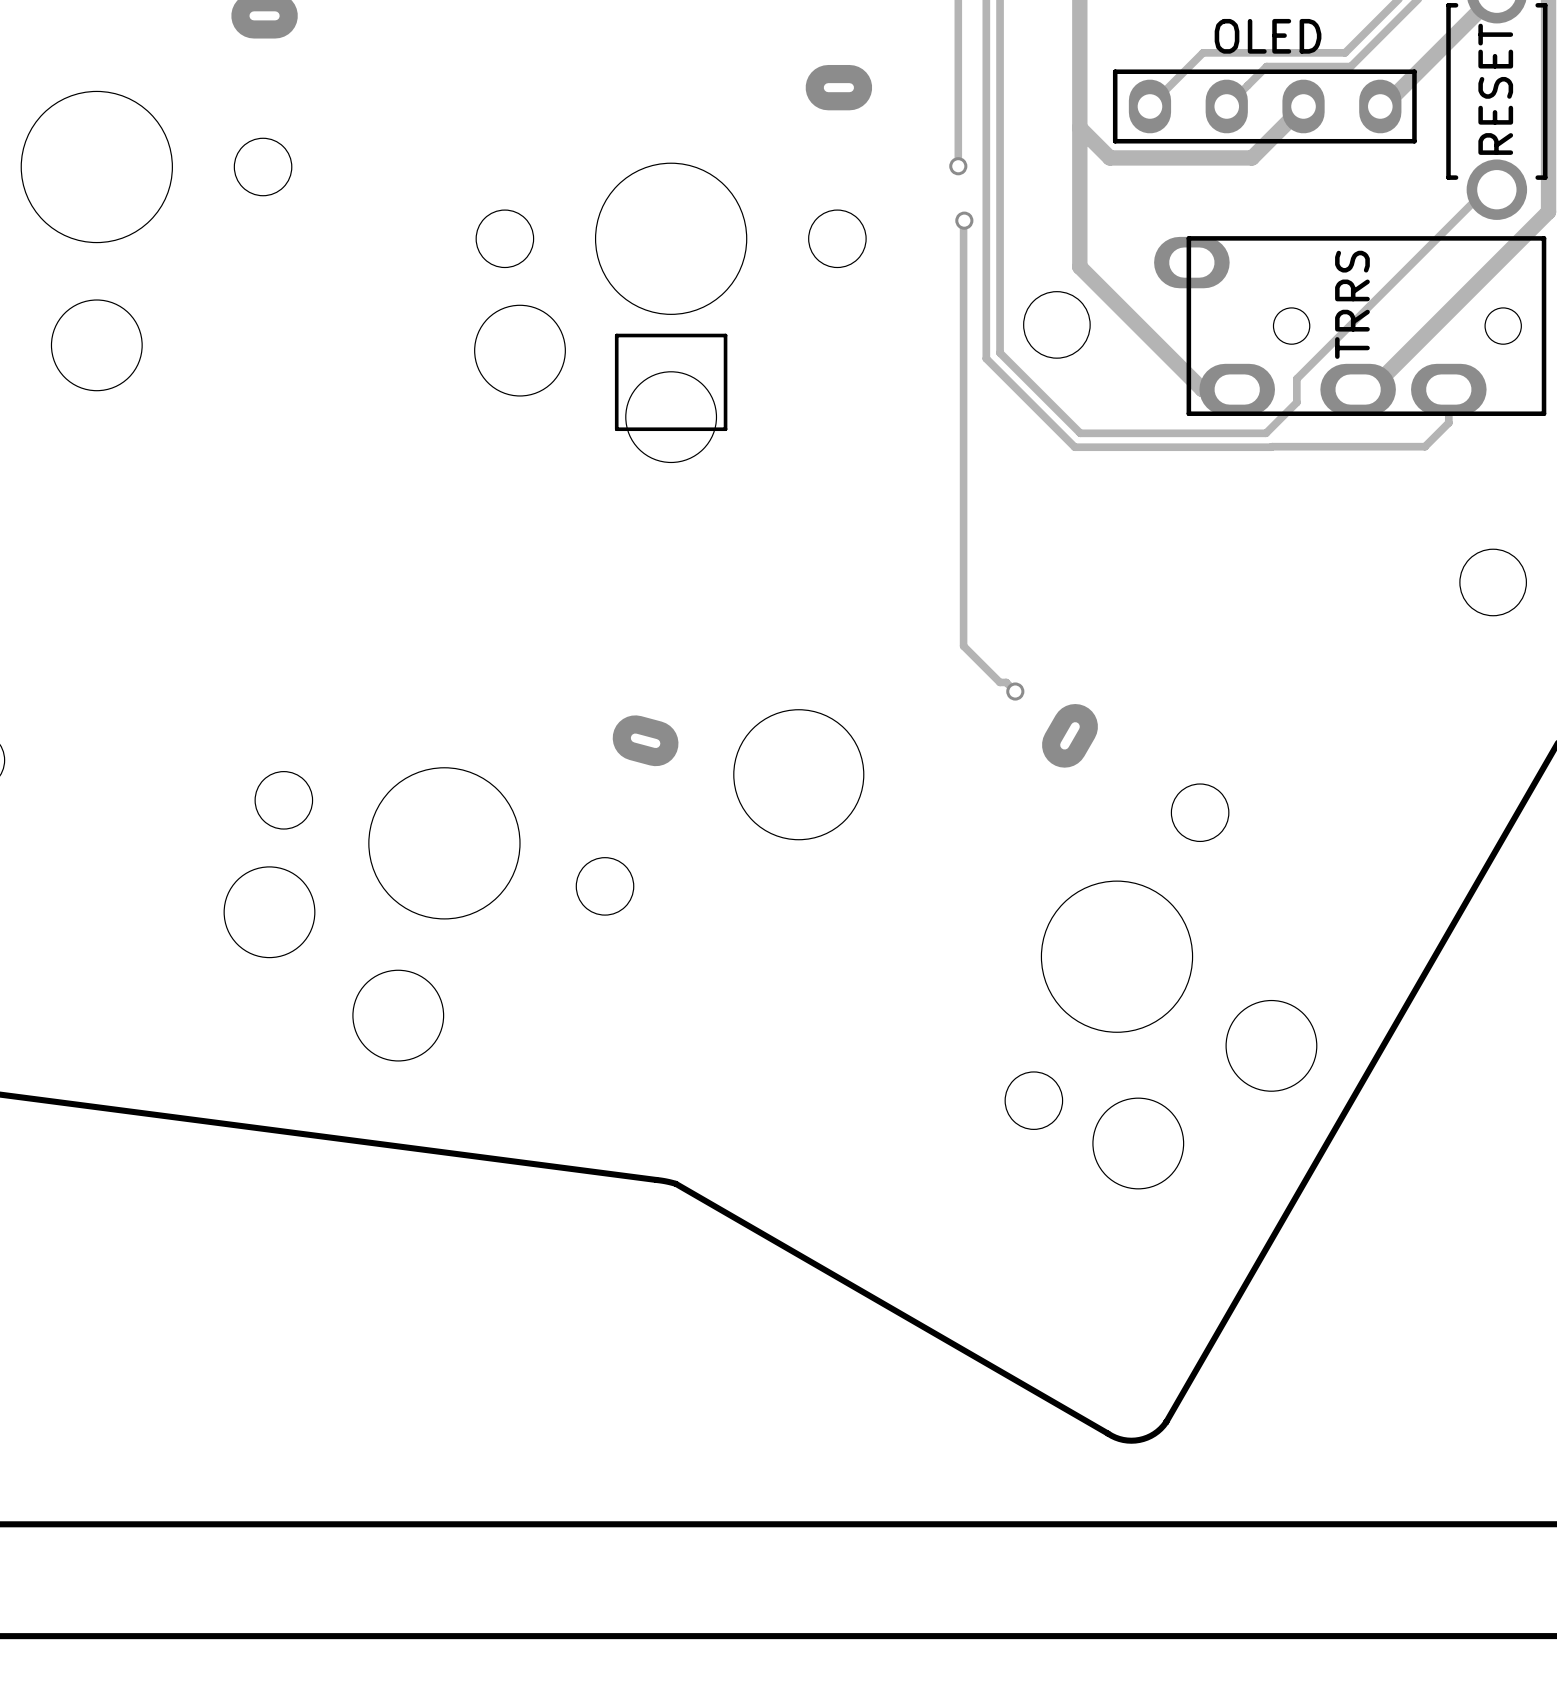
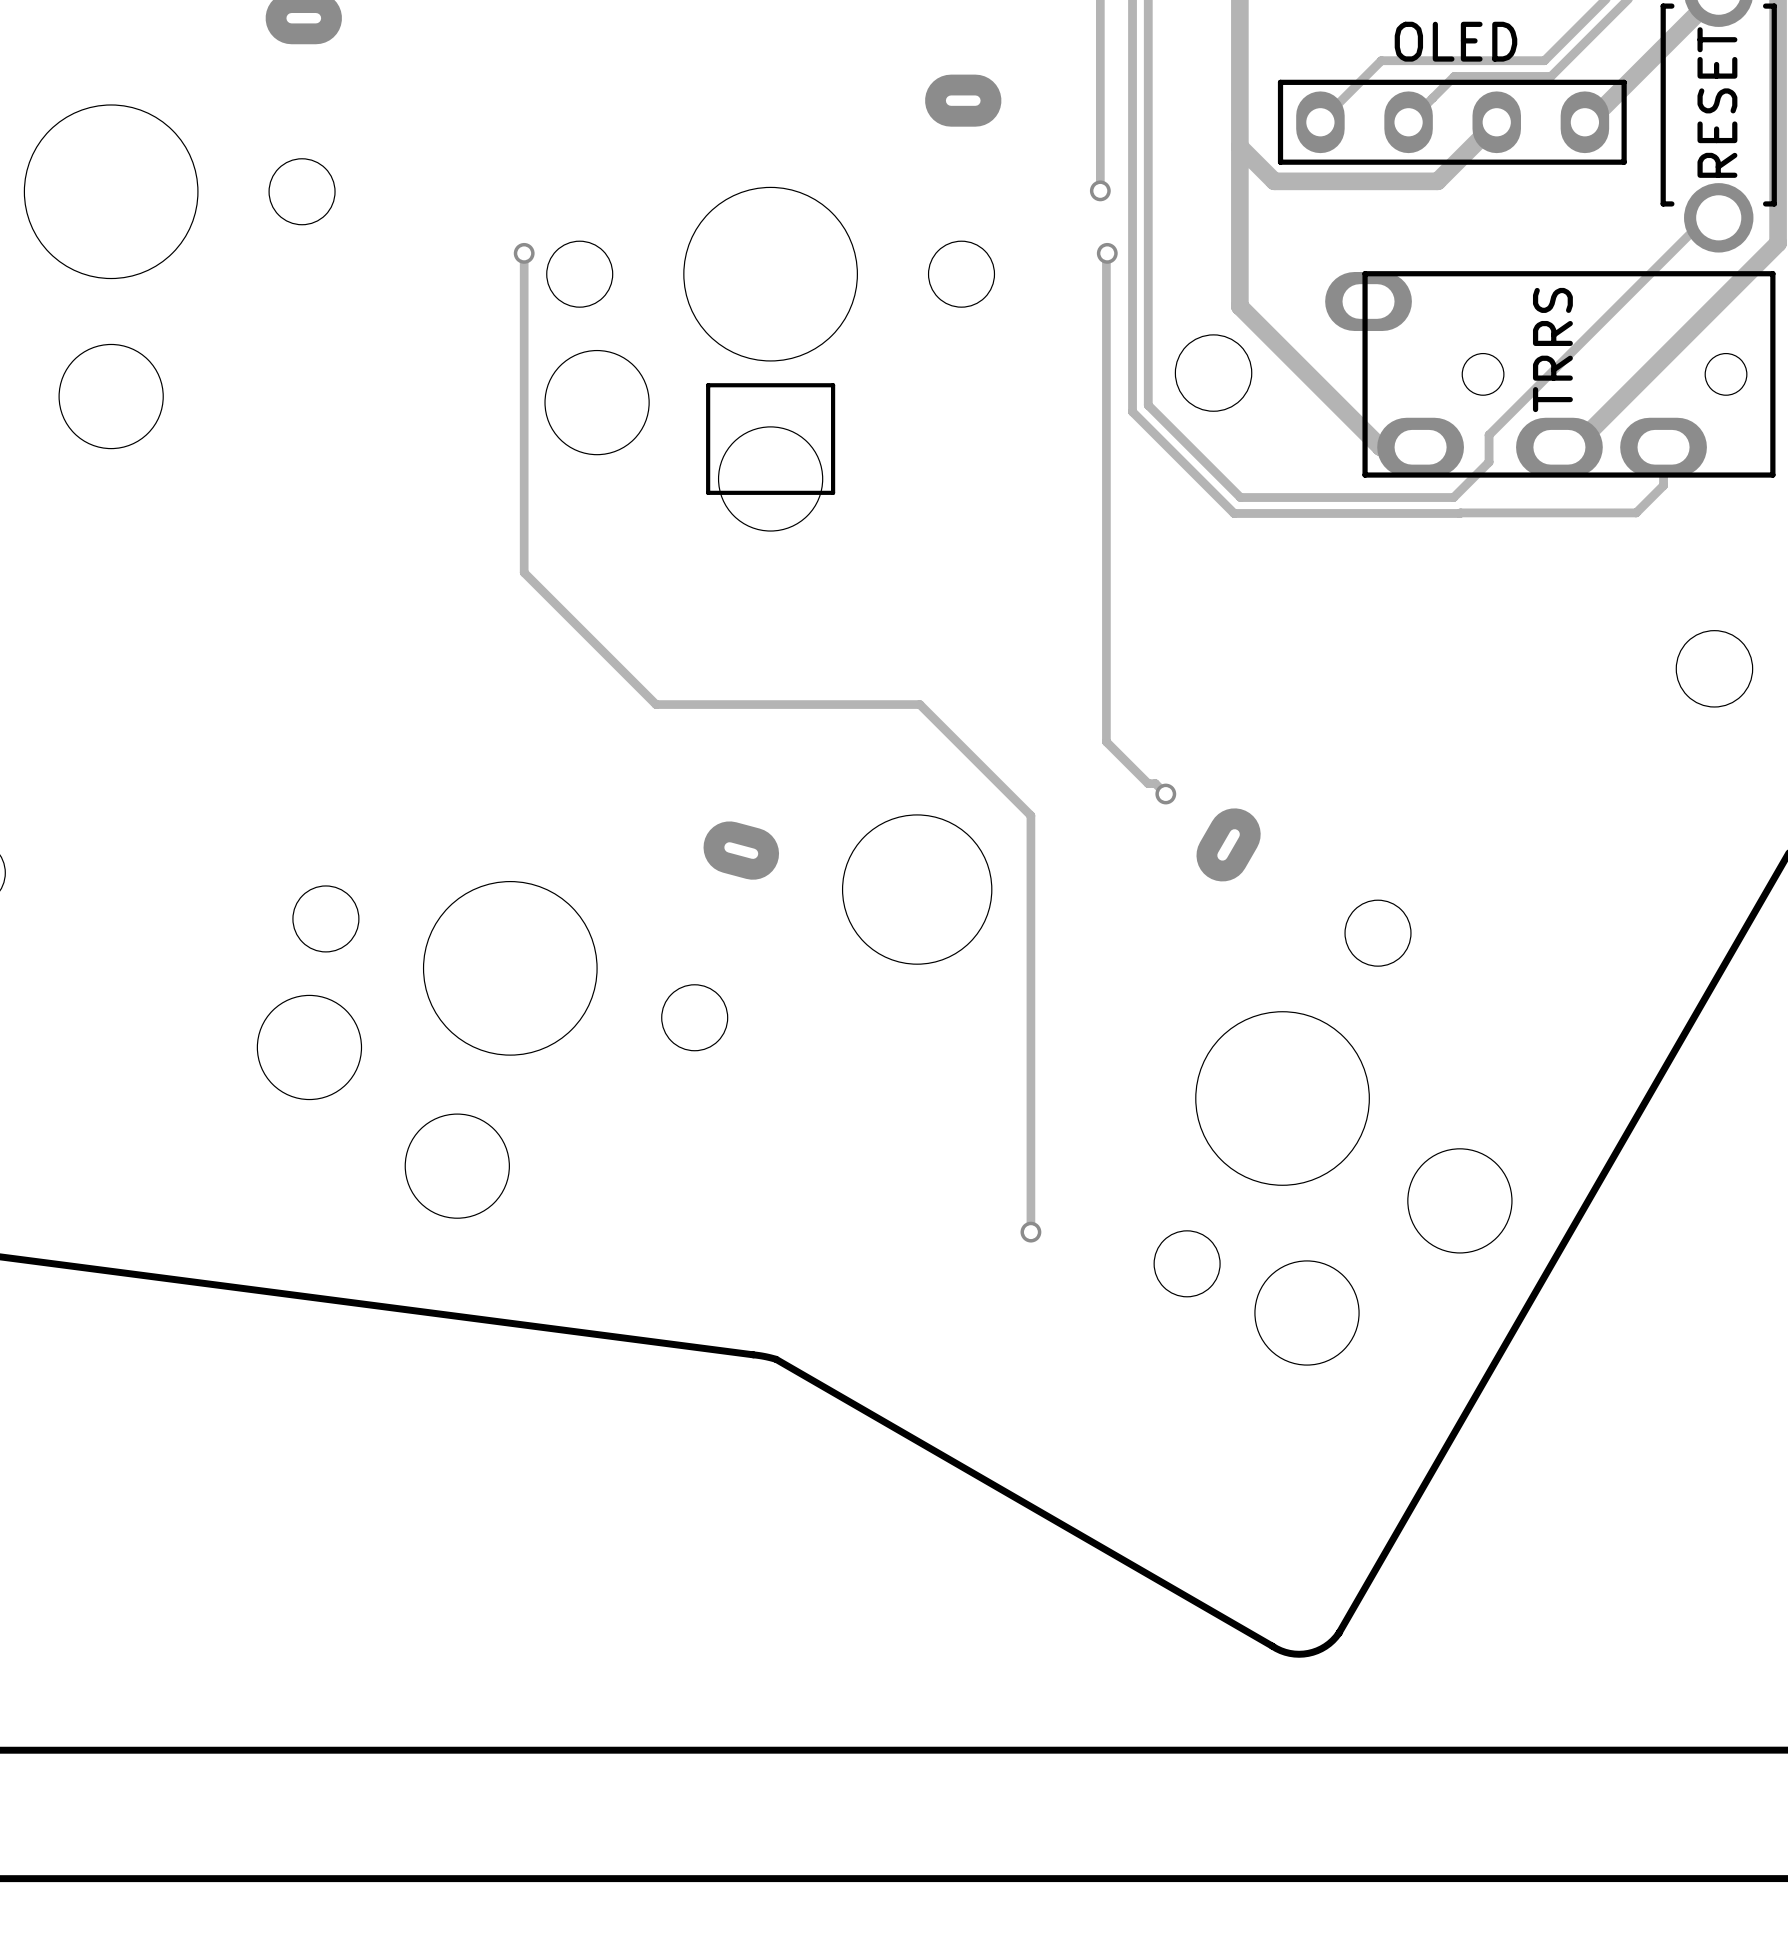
track: none -> (524, 253) (524, 572) (656, 704) (919, 704) (1030, 815) (1030, 1232)
via: none -> (524, 253)
via: none -> (1030, 1232)

